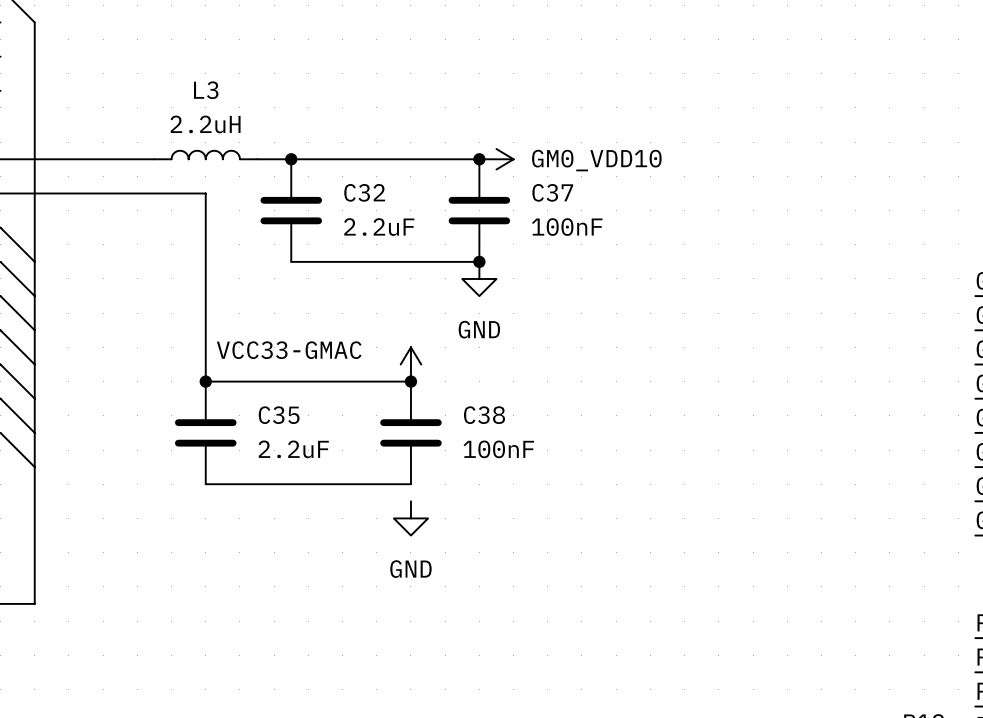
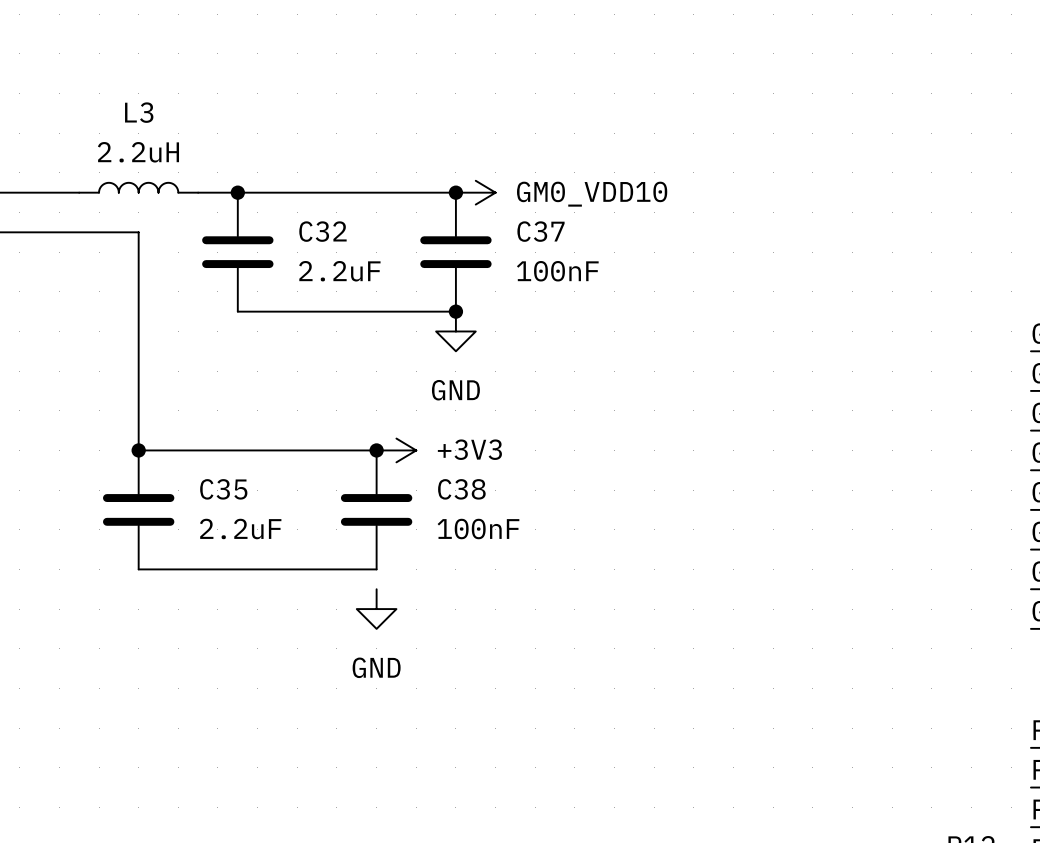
power symbol: VCC33-GMAC (410, 364) -> none
power symbol: none -> +3V3 (396, 450)

